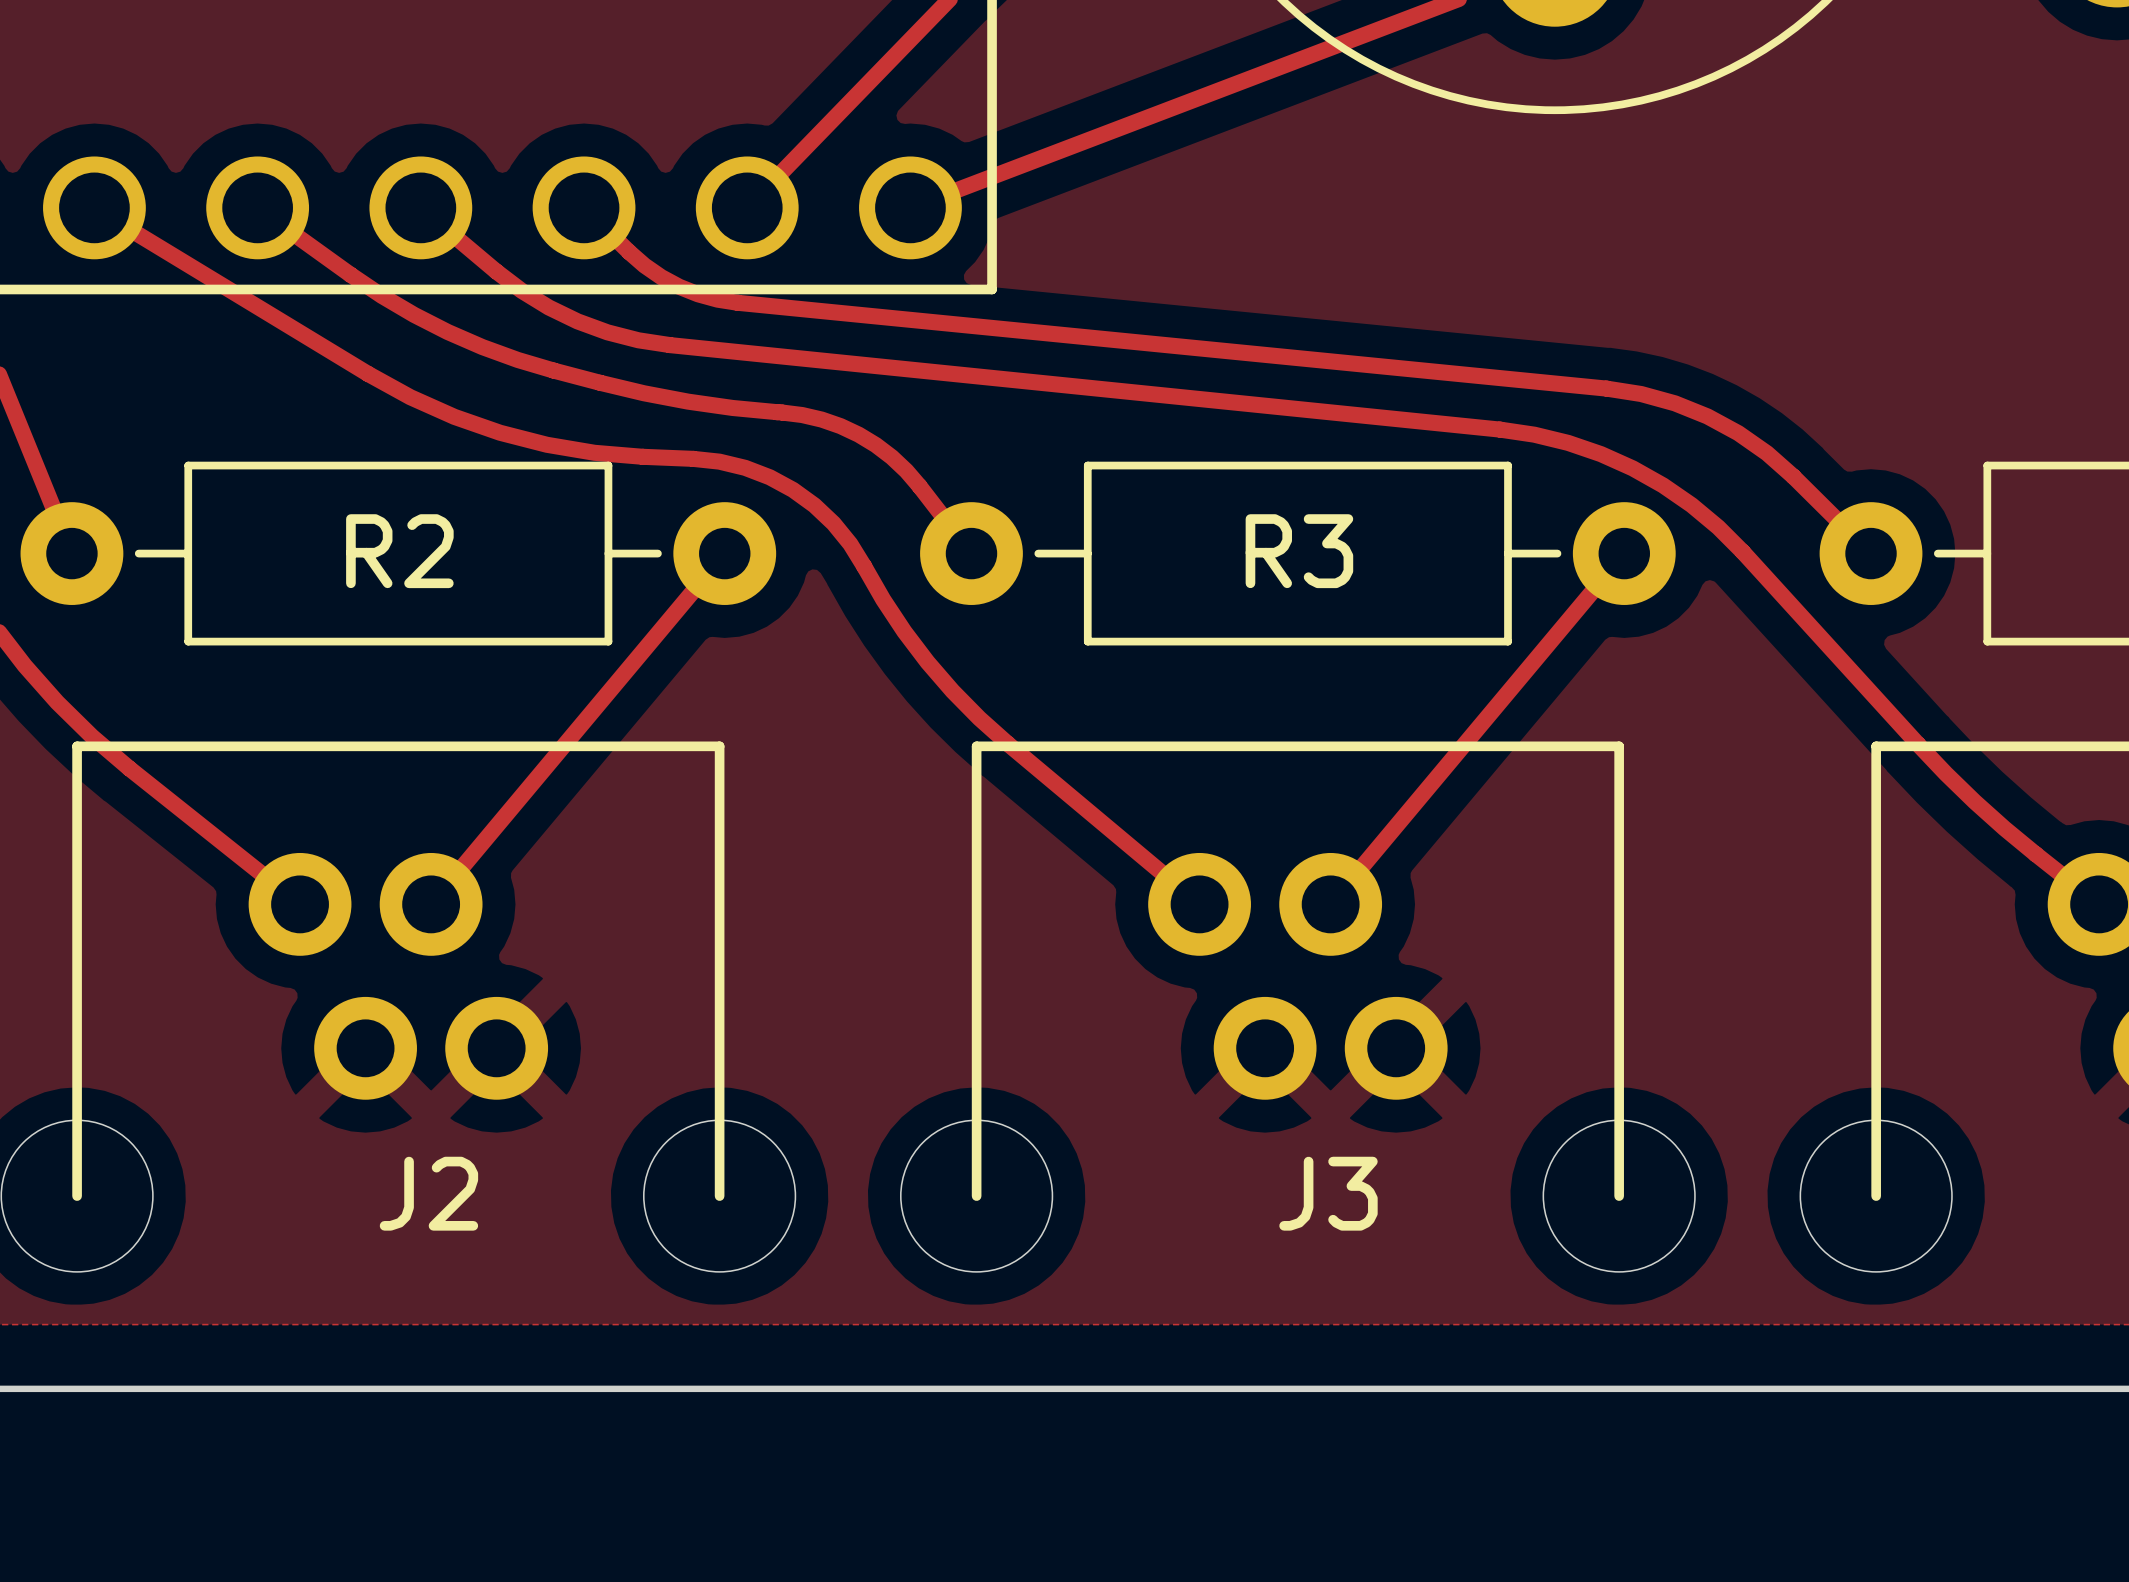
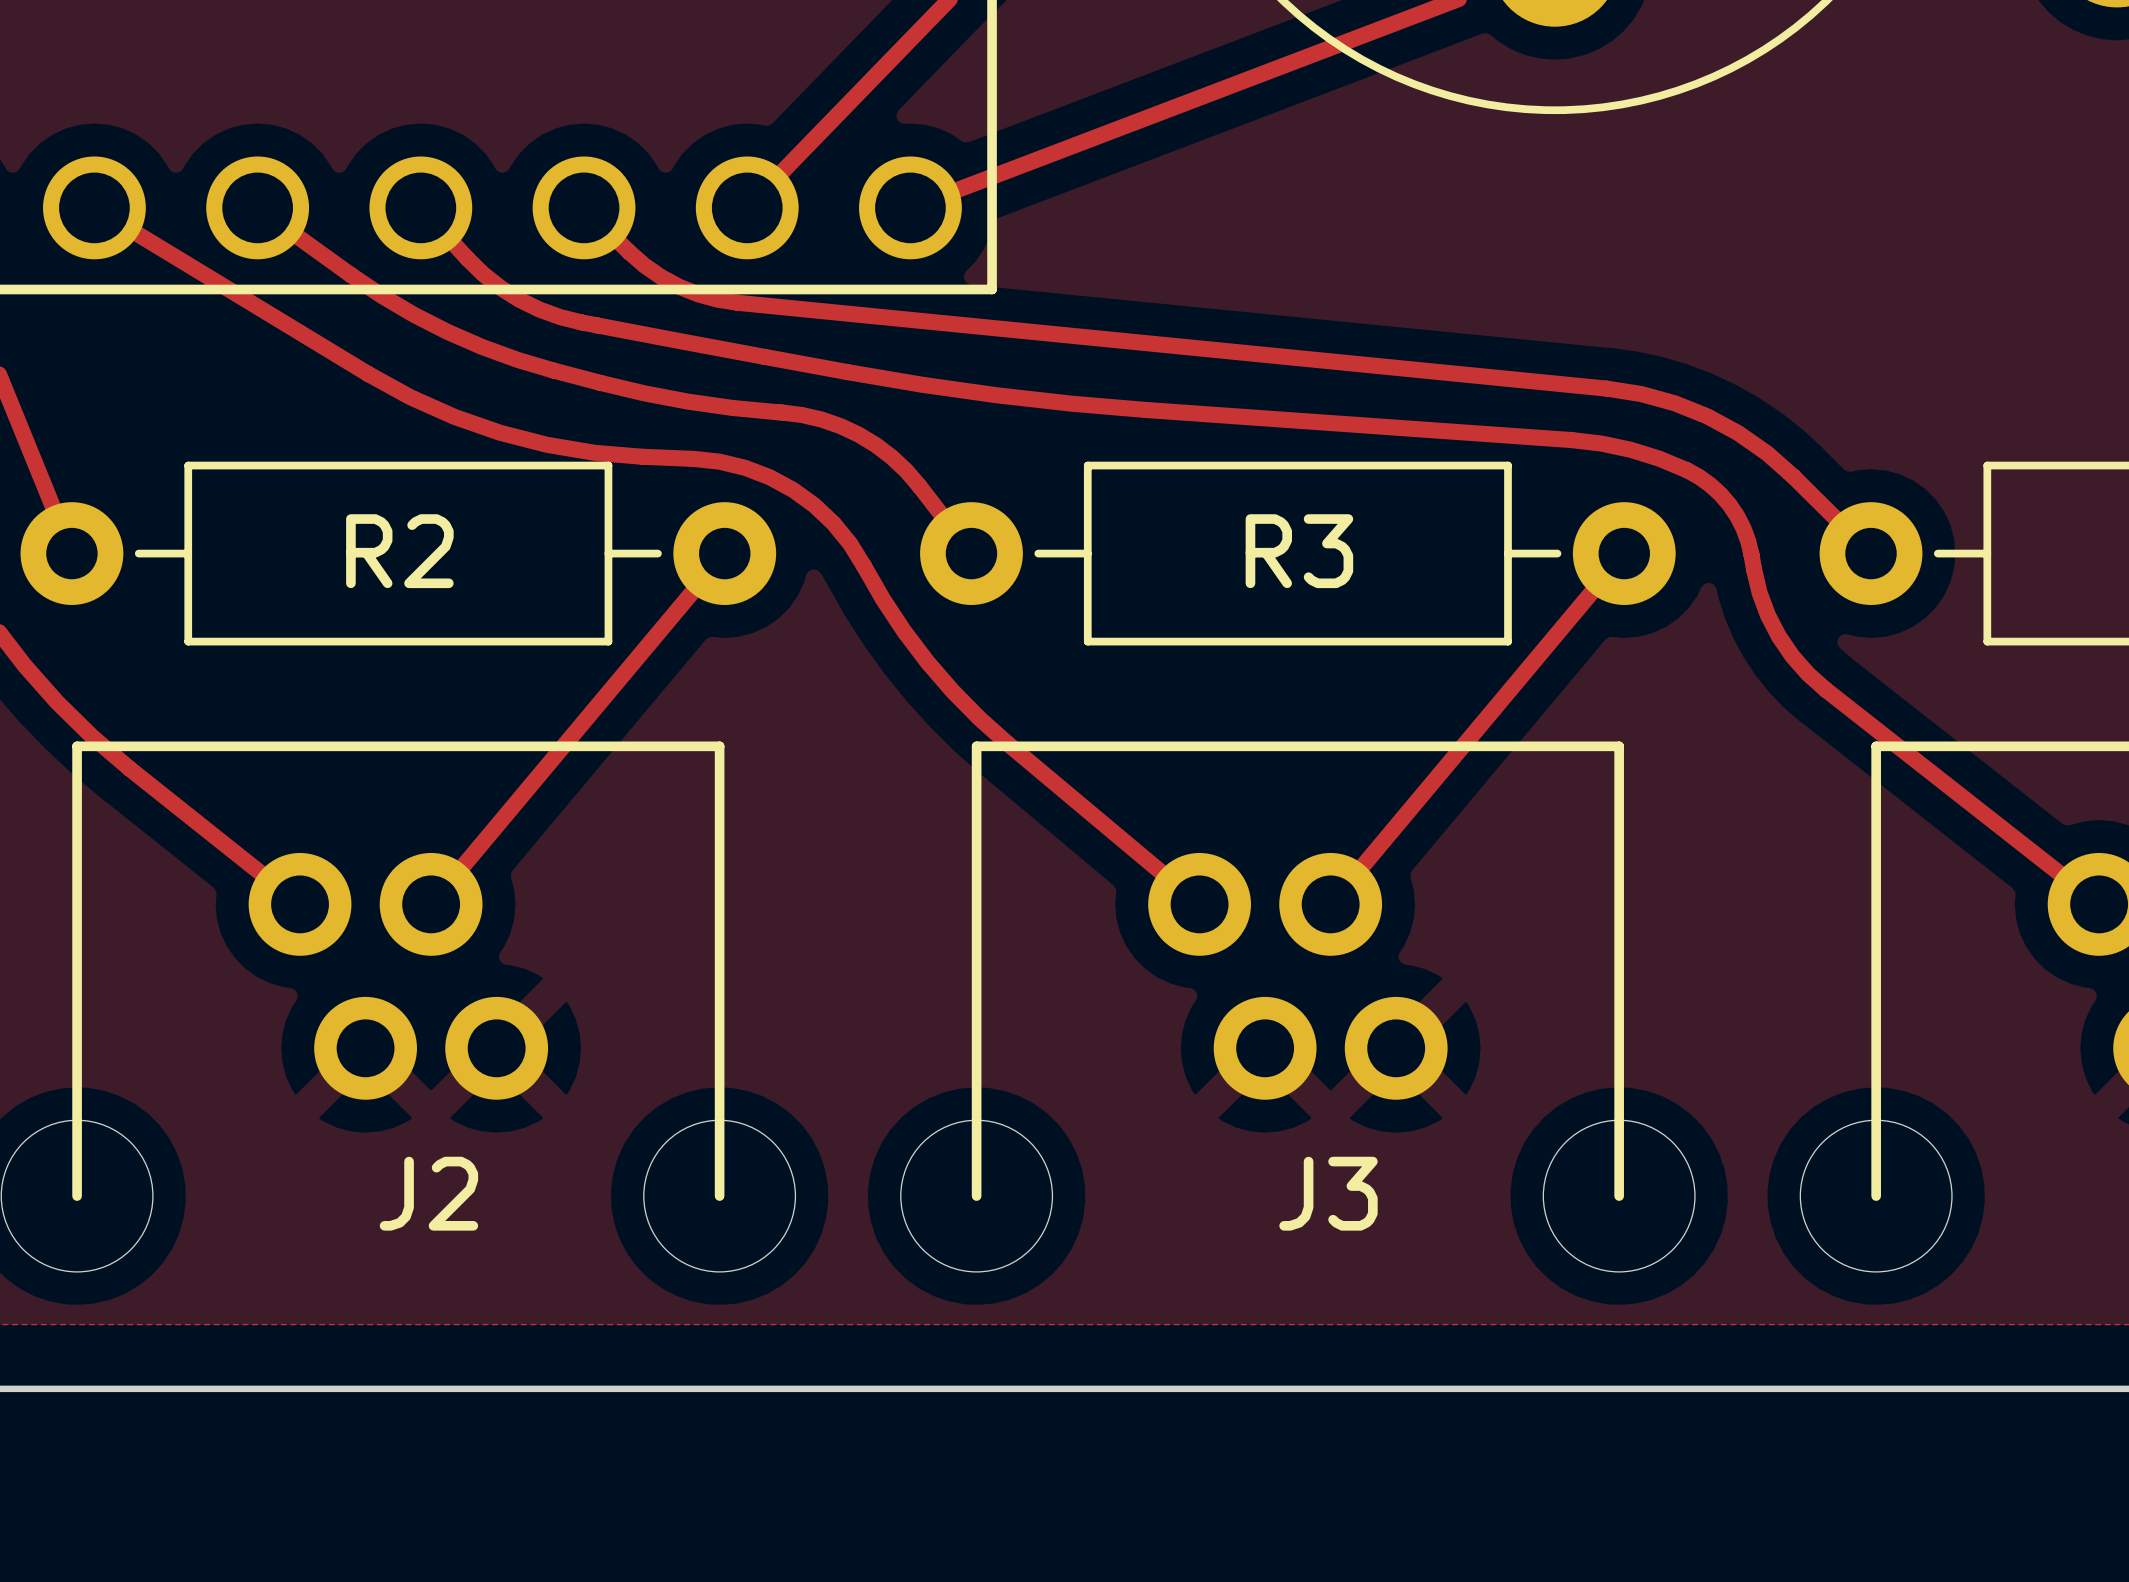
track: (420, 207) (496, 271) (521, 290) (548, 307) (577, 321) (607, 332) (638, 340) (670, 345) (1500, 429) (1534, 434) (1568, 442) (1601, 454) (1632, 468) (1663, 485) (1691, 505) (1718, 527) (1945, 773) (2004, 828) (2099, 904) -> (420, 207) (467, 258) (500, 287) (539, 309) (581, 322) (847, 372) (996, 395) (1145, 409) (1571, 440) (1630, 449) (1659, 458) (1698, 476) (1710, 484) (1729, 504) (1743, 528) (1748, 541) (1759, 592) (1767, 615) (1792, 656) (1808, 673) (2099, 904)

